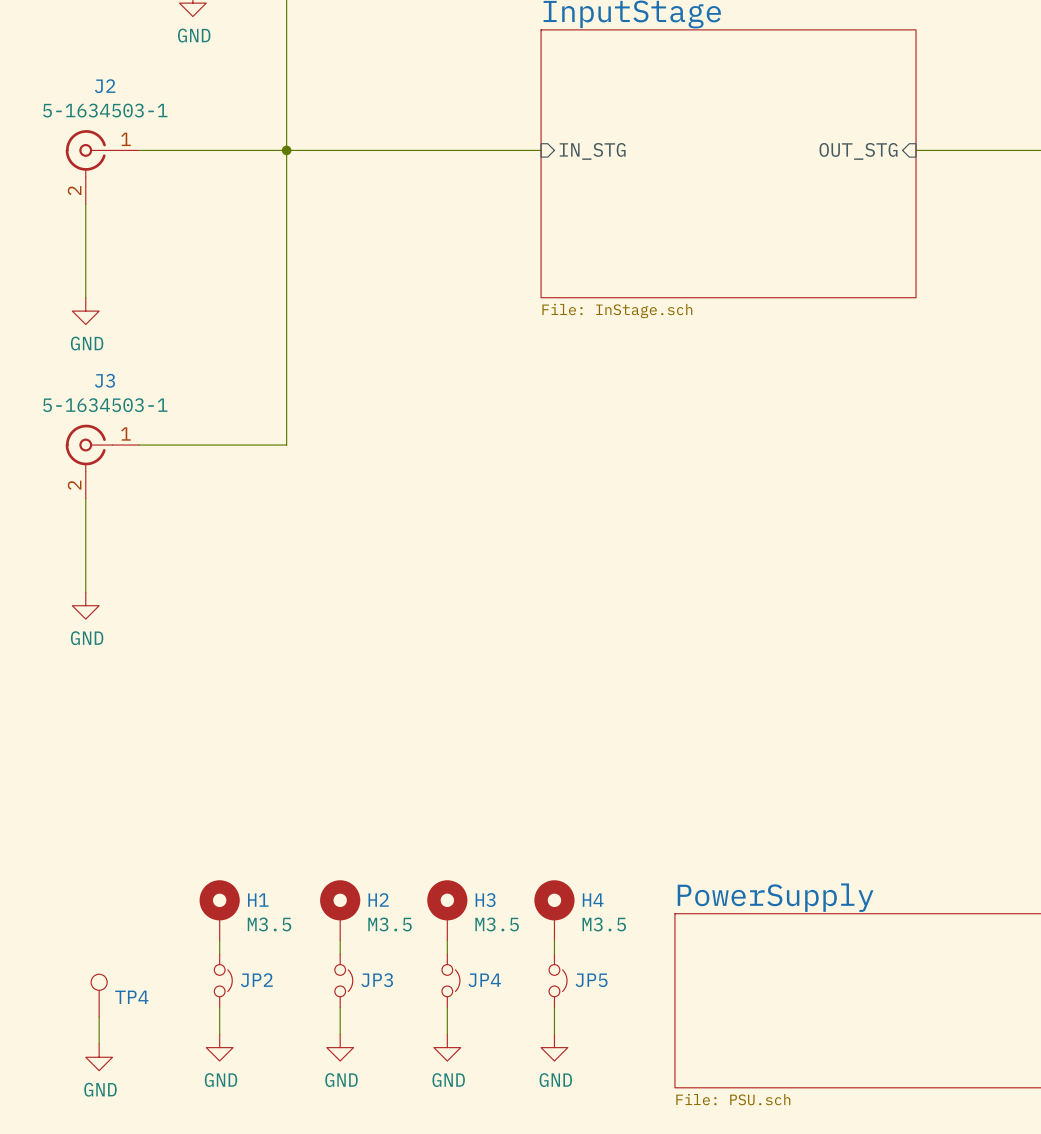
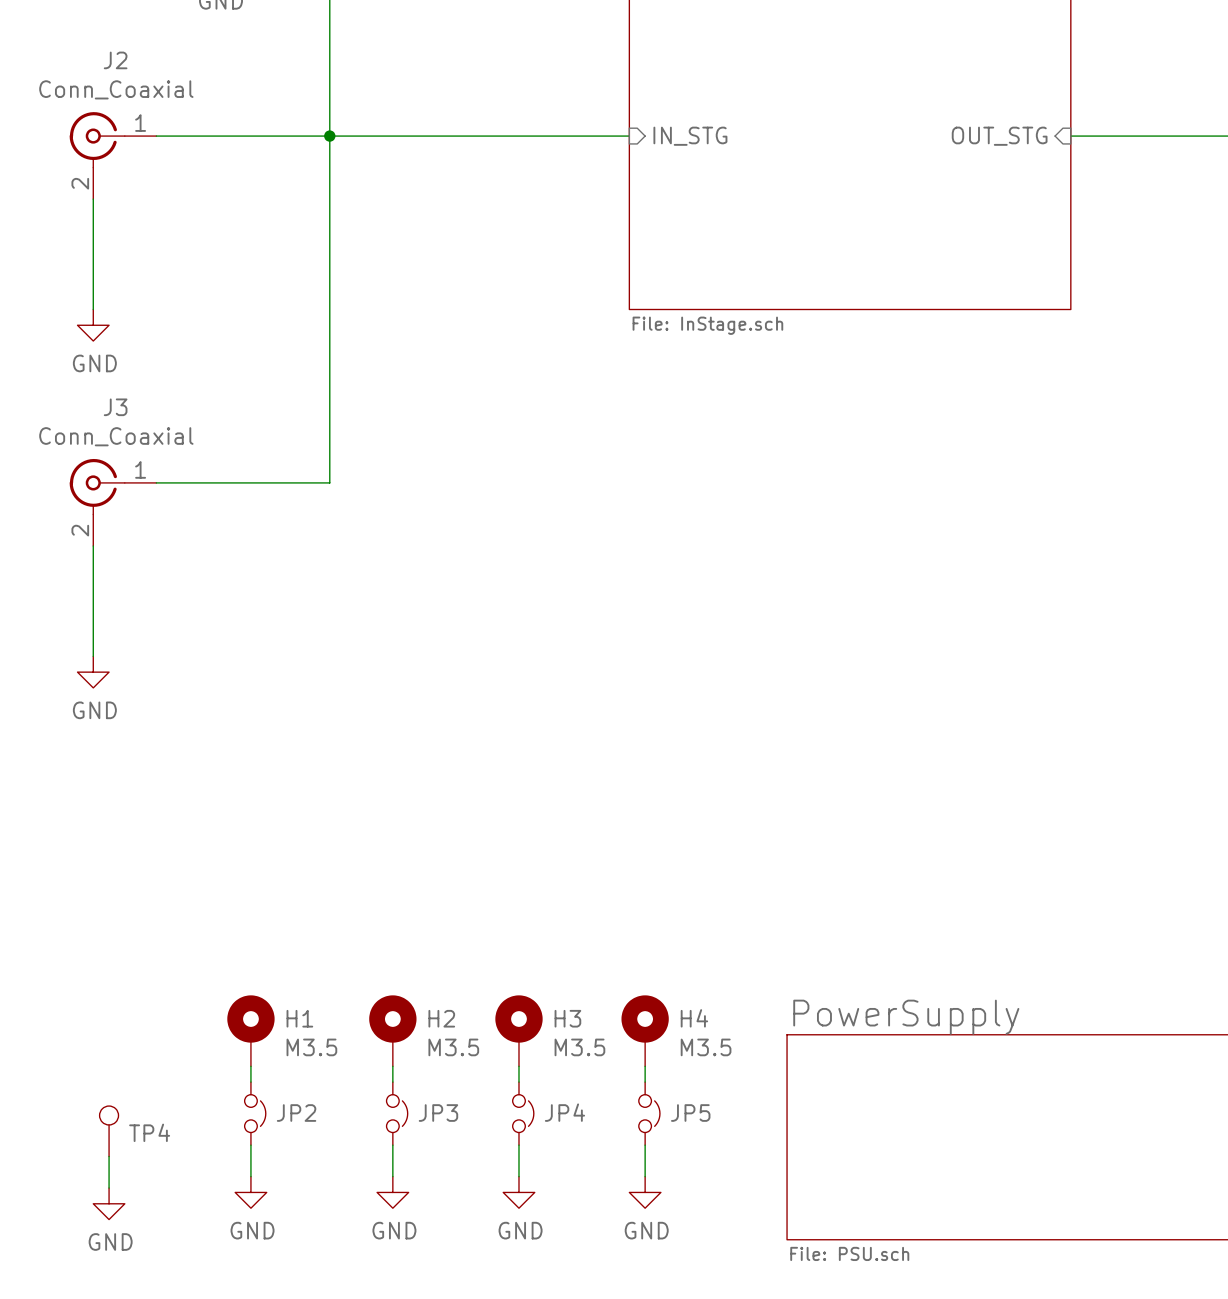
J2 value: 5-1634503-1 (105, 110) -> Conn_Coaxial (116, 89)
J3 value: 5-1634503-1 (105, 405) -> Conn_Coaxial (116, 436)

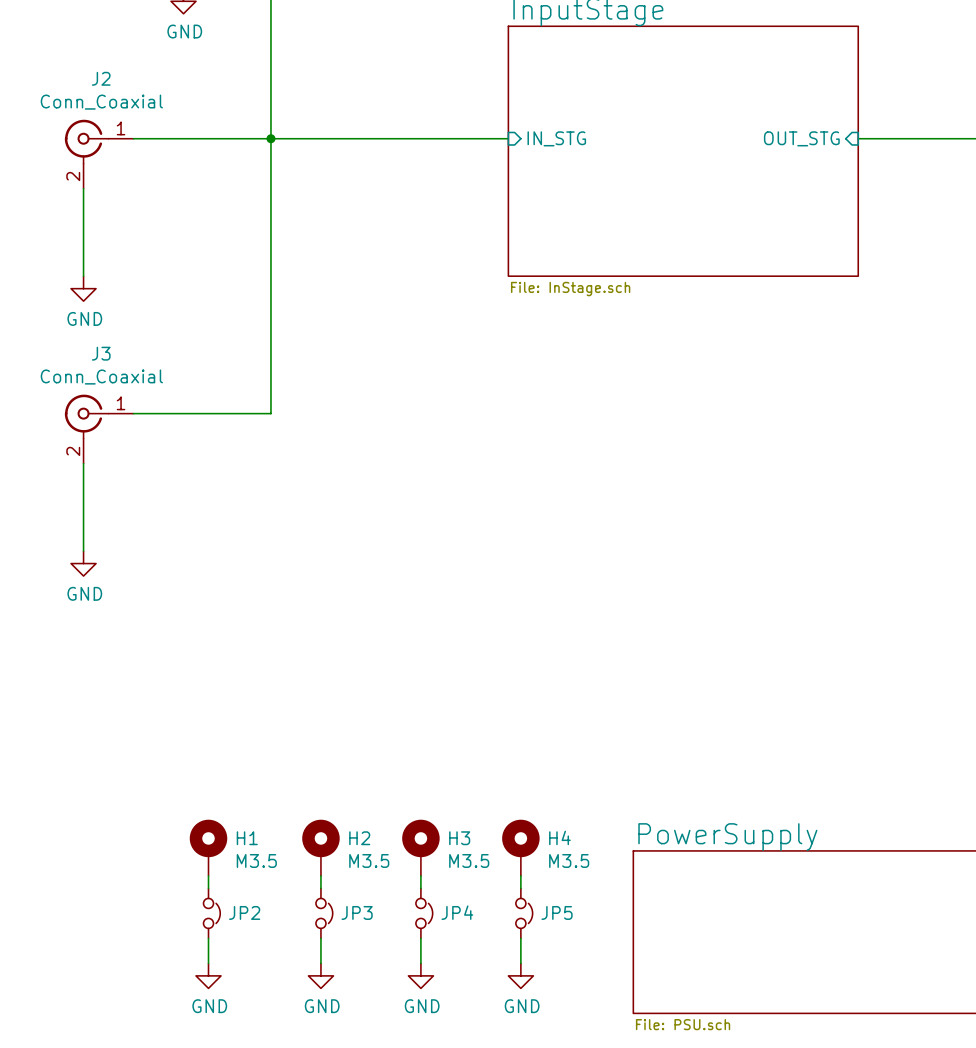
TP4: (109, 1131) -> none
wire: (109, 1156) (109, 1188) -> none
power symbol: GND (109, 1203) -> none

